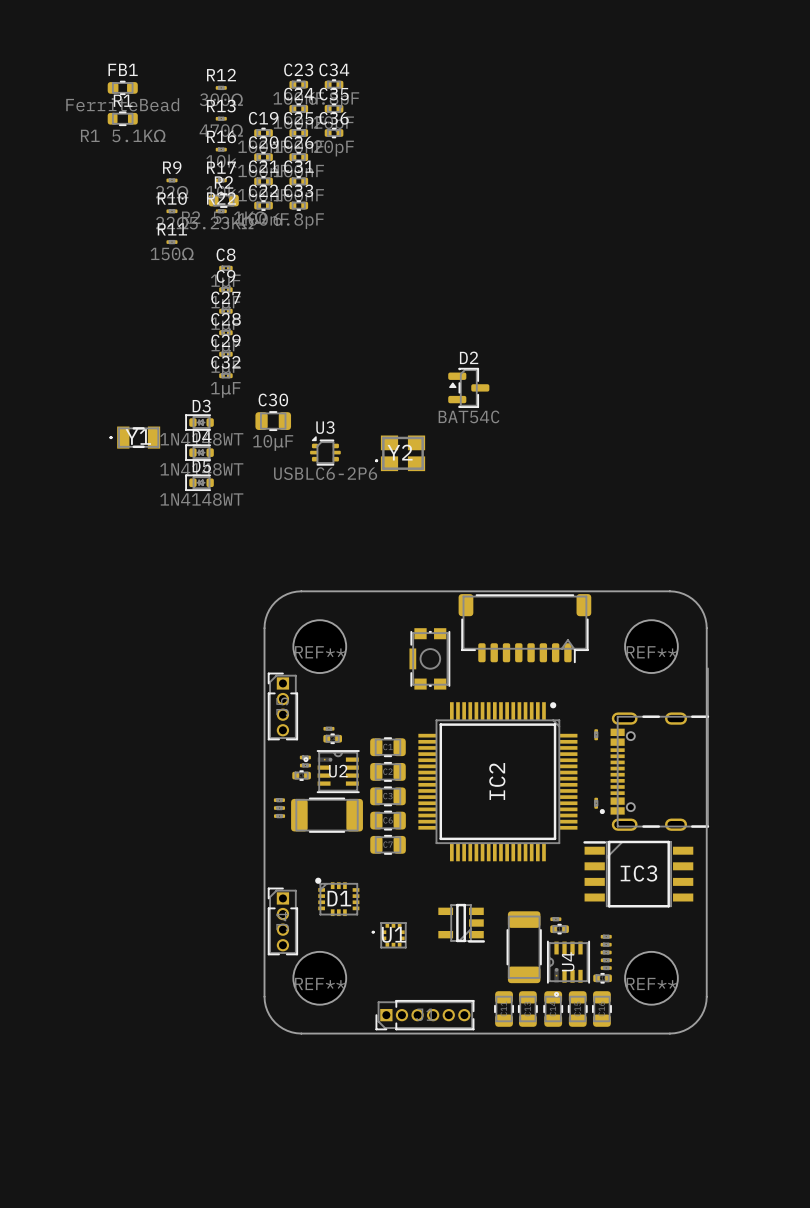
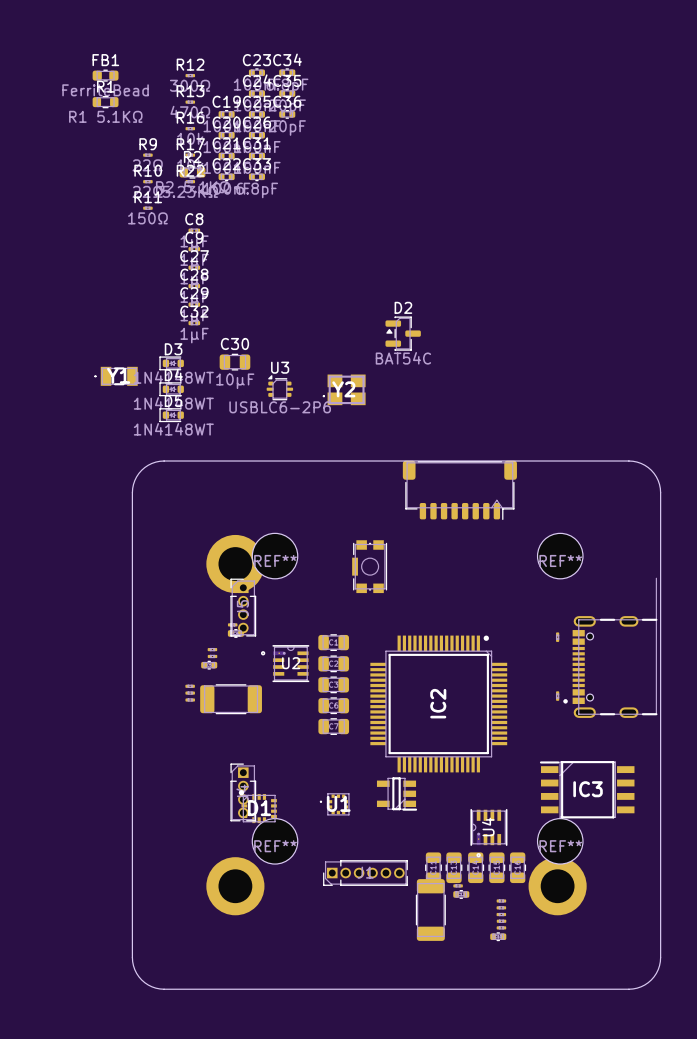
board edge: (301, 591) (669, 591) (683, 594) (695, 602) (703, 614) (706, 628) (706, 996) (703, 1010) (695, 1022) (683, 1030) (669, 1033) (301, 1033) (287, 1030) (275, 1022) (267, 1010) (264, 996) (264, 628) (267, 614) (275, 602) (287, 594) (301, 591) -> (164, 461) (151, 463) (141, 470) (134, 480) (132, 492) (132, 957) (134, 969) (141, 979) (151, 986) (164, 989) (628, 989) (641, 986) (651, 979) (658, 969) (660, 957) (660, 492) (658, 480) (651, 470) (641, 463) (628, 461) (164, 461)
part position: (524, 628) -> (459, 490)
part: none -> (235, 564)
part footprint: [599, 667, 710, 831] -> [556, 632, 560, 642]
part: none -> (232, 624)
part: (328, 728) -> none
part: (596, 734) -> none
part position: (332, 738) -> (235, 633)
part: none -> (610, 647)
part: none -> (212, 649)
part: (305, 757) -> none
part: none -> (212, 656)
part: (305, 765) -> none
part position: (301, 775) -> (209, 665)
IC2 position: (497, 781) -> (438, 703)
part: none -> (190, 686)
part: (279, 800) -> none
part: (596, 803) -> none
part: none -> (190, 693)
part: (279, 808) -> none
part: none -> (557, 696)
part: none -> (190, 699)
part position: (327, 815) -> (231, 699)
part: (279, 816) -> none
IC3 position: (638, 874) -> (587, 789)
D1 position: (337, 896) -> (257, 806)
part: (555, 919) -> none
part position: (559, 929) -> (461, 894)
part: (606, 936) -> none
part: (606, 944) -> none
part position: (524, 947) -> (430, 910)
part: (606, 952) -> none
part: (606, 960) -> none
part: (606, 968) -> none
part position: (602, 978) -> (498, 936)
part: none -> (235, 886)
part: none -> (458, 885)
part: none -> (557, 886)
part: none -> (501, 900)
part: none -> (501, 907)
part: none -> (501, 914)
part: none -> (501, 921)
part: none -> (501, 927)

